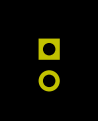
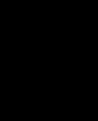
part: (49, 65) -> none

